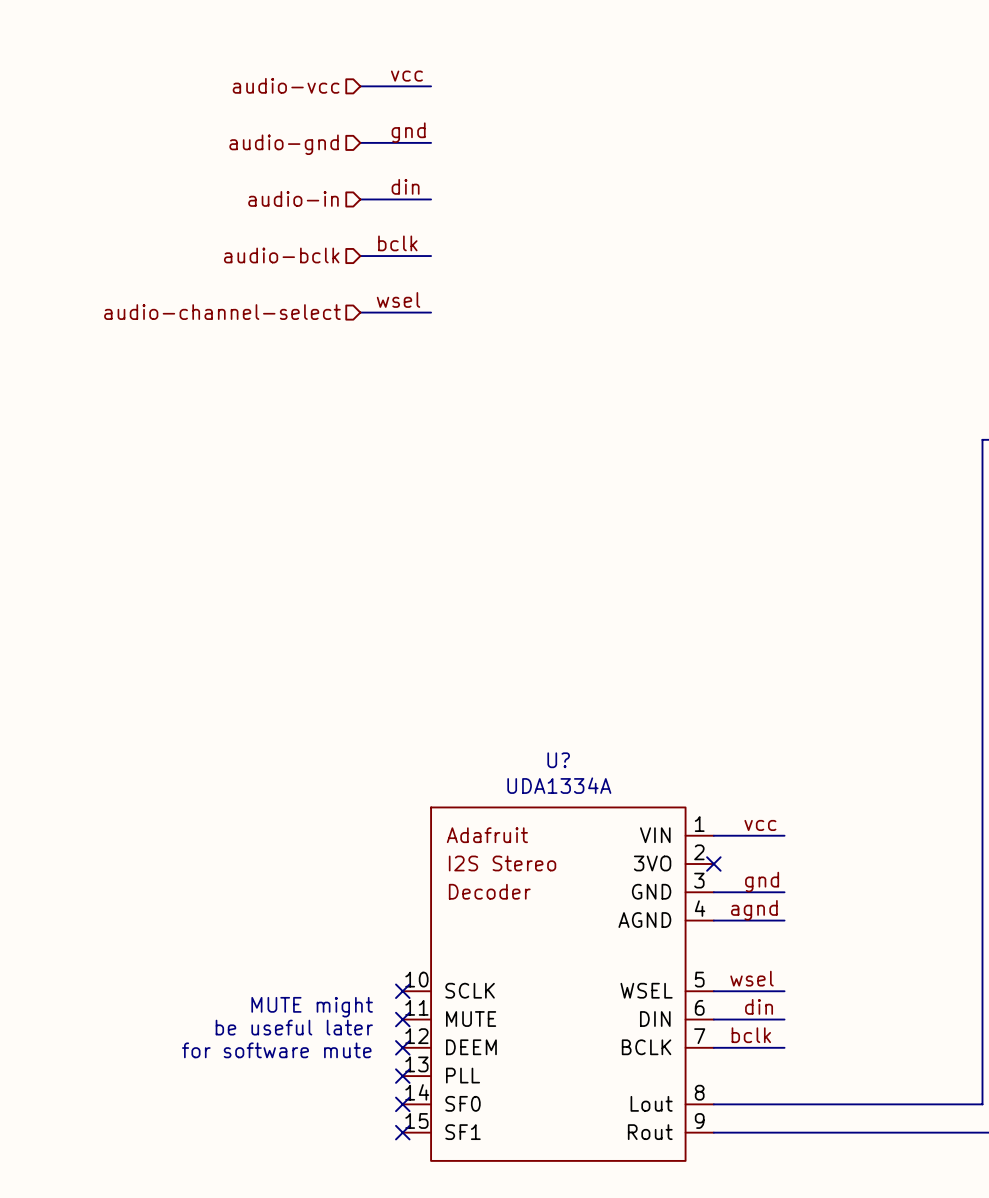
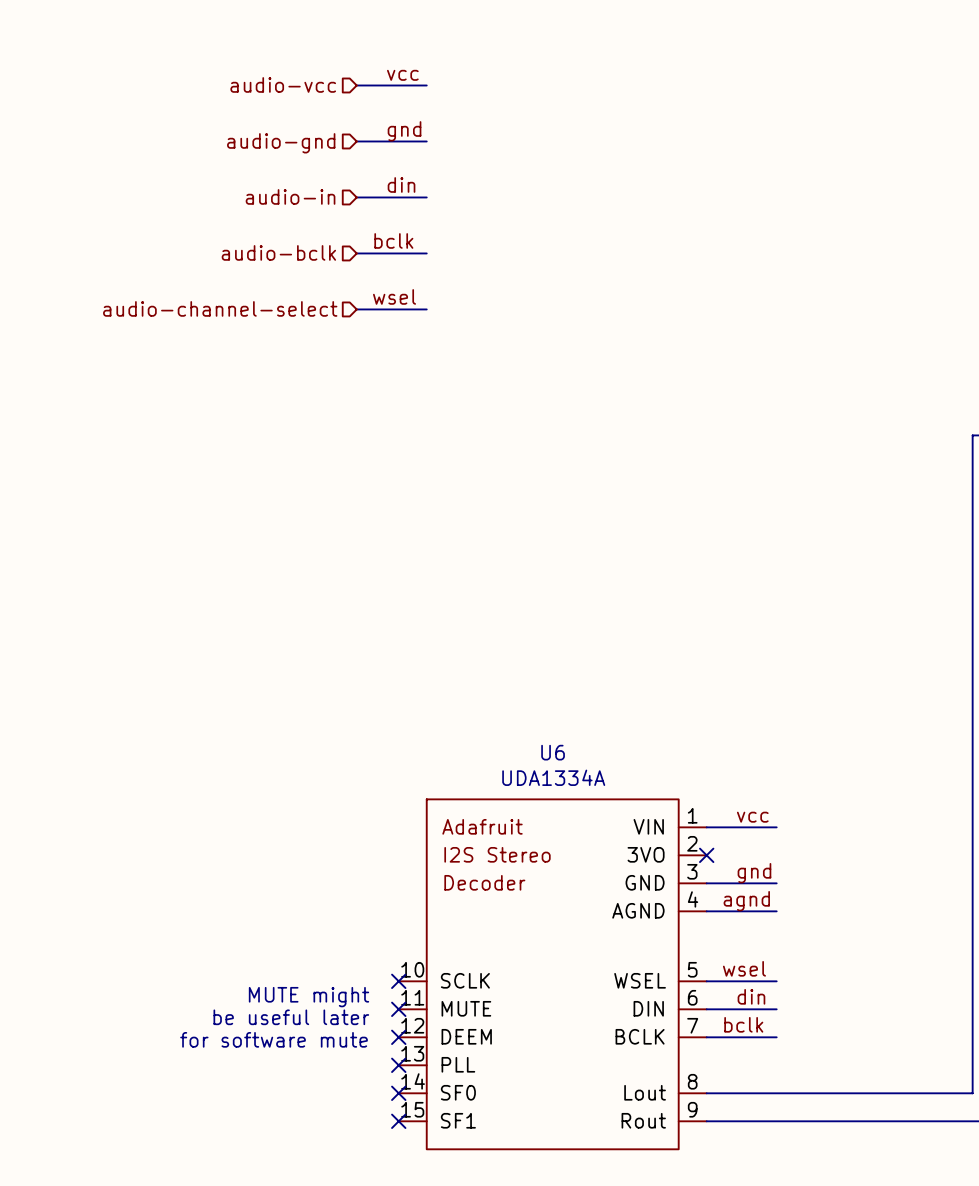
U? name: U? (558, 760) -> U6 (553, 752)

